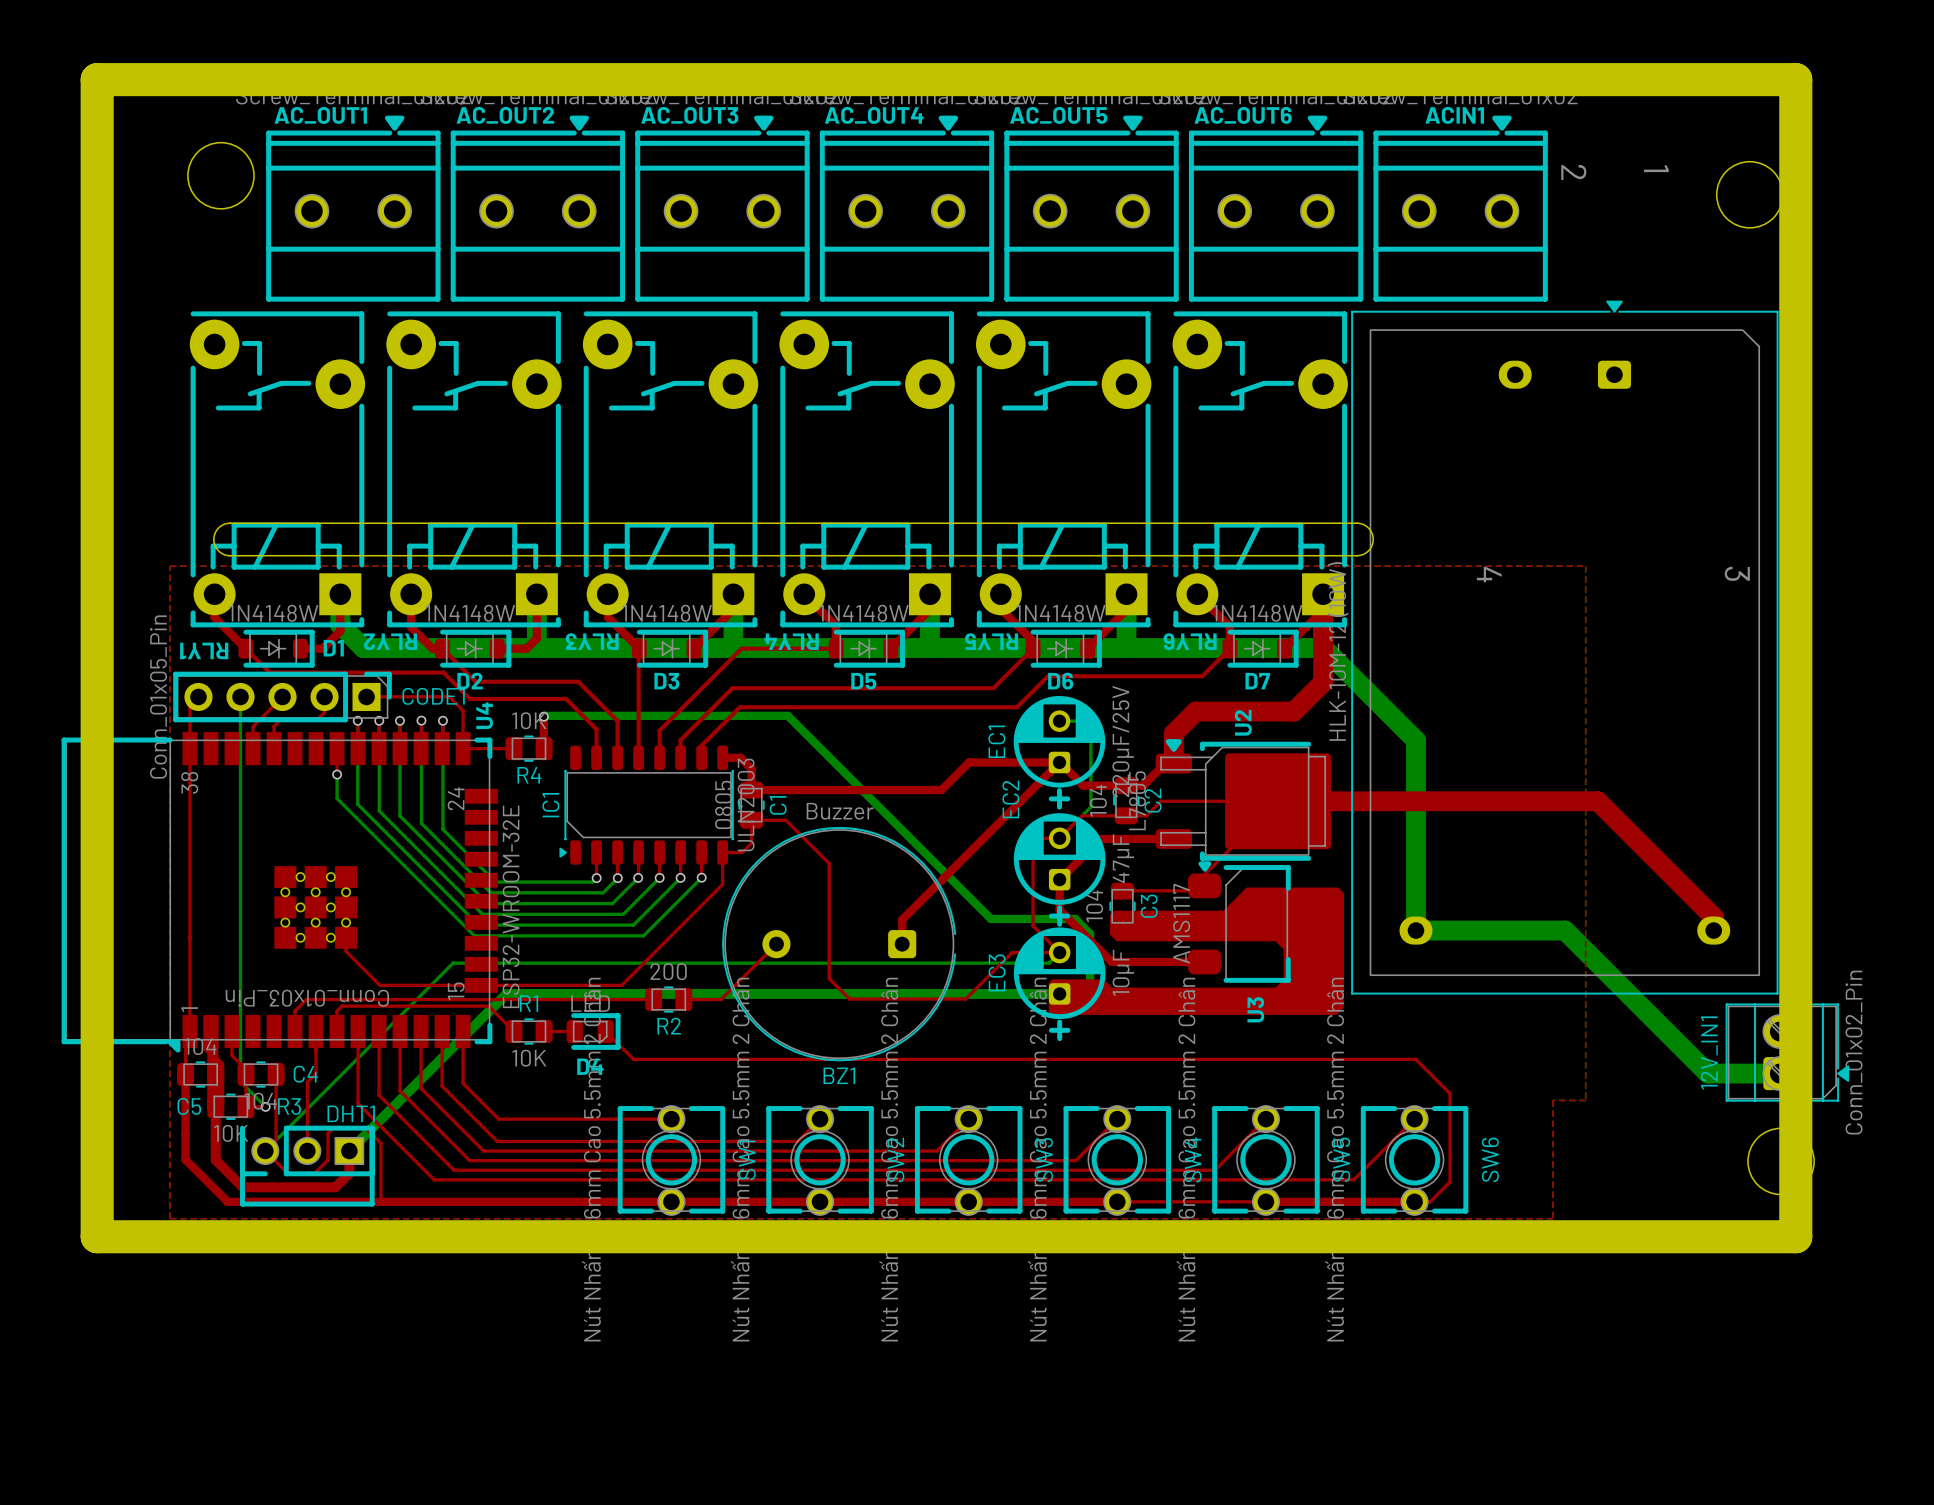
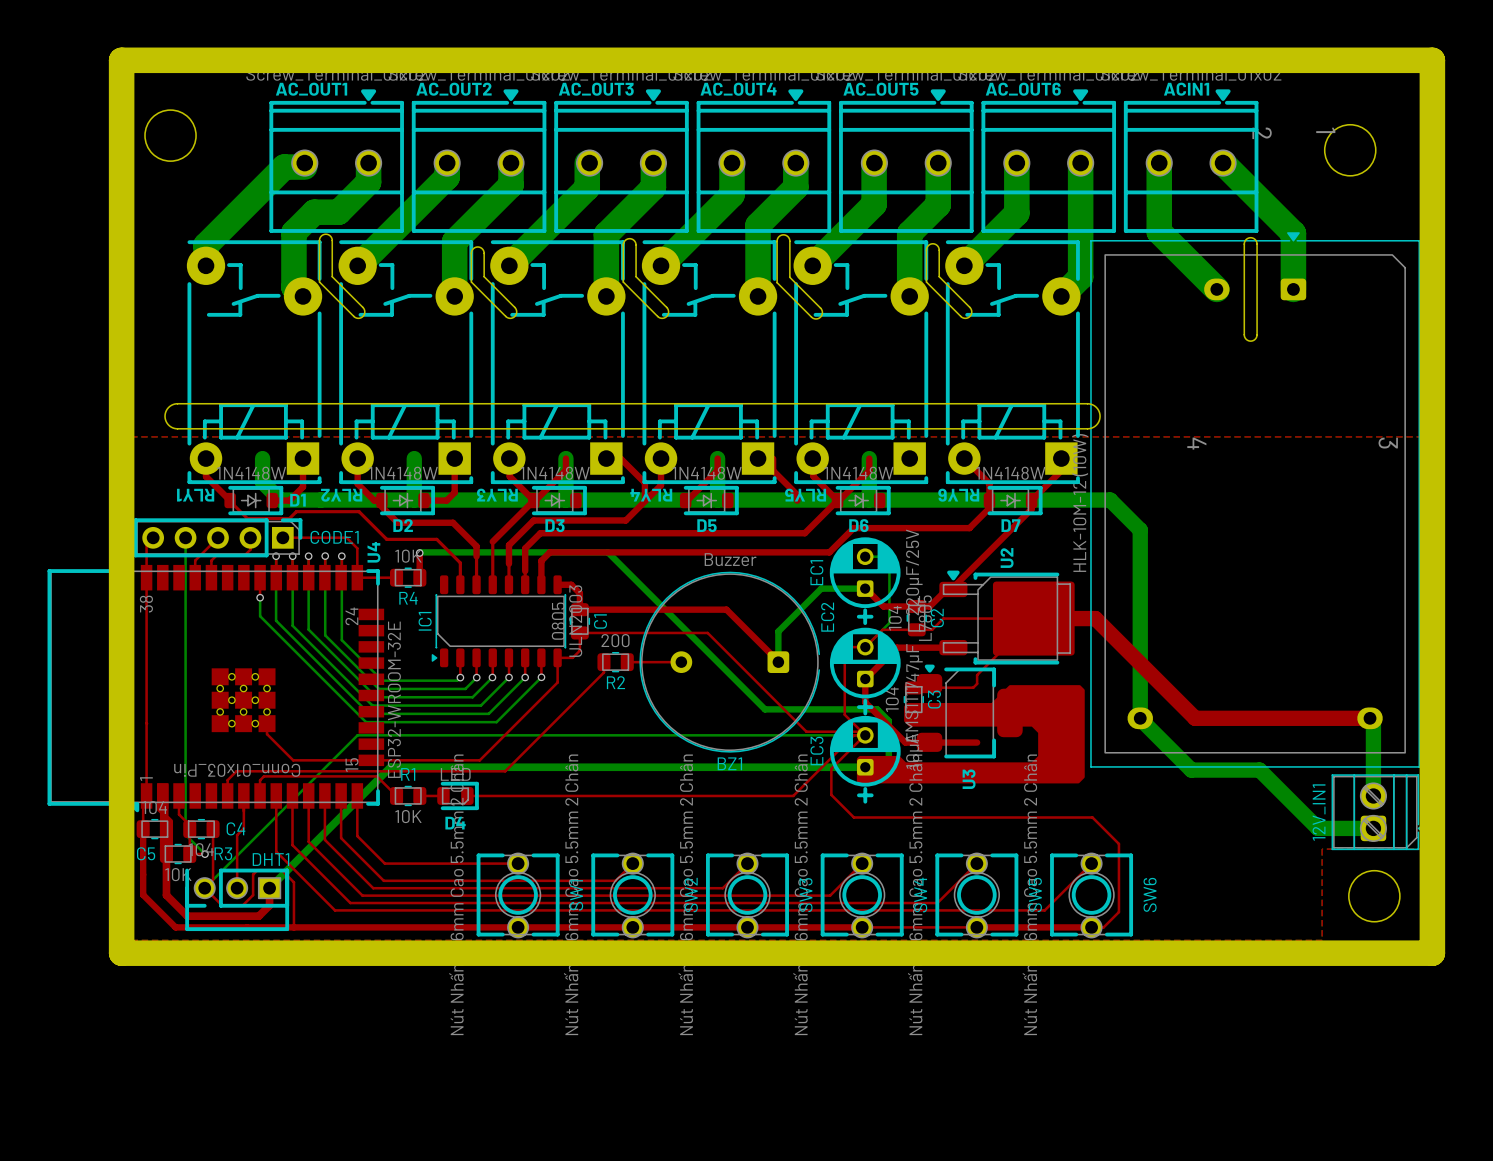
board edge: (97, 79) (1795, 79) (1795, 1236) (97, 1236) (97, 79) -> (121, 60) (1432, 60) (1432, 953) (121, 953) (121, 60)
AC_OUT1 position: (353, 208) -> (336, 161)
AC_OUT2 position: (537, 208) -> (479, 161)
AC_OUT3 position: (722, 208) -> (621, 161)
AC_OUT4 position: (906, 208) -> (763, 161)
AC_OUT5 position: (1091, 208) -> (906, 161)
AC_OUT6 position: (1276, 208) -> (1048, 161)
ACIN1 position: (1460, 208) -> (1191, 161)
bottom track: none -> (368, 163) (368, 182) (338, 212) (314, 212) (293, 232) (293, 287) (303, 296)
bottom track: none -> (447, 163) (447, 177) (358, 265)
bottom track: none -> (511, 163) (511, 185) (454, 241) (454, 296)
bottom track: none -> (587, 163) (587, 187) (509, 265)
bottom track: none -> (653, 163) (653, 187) (606, 234) (606, 296)
bottom track: none -> (732, 163) (732, 194) (661, 265)
bottom track: none -> (795, 163) (795, 187) (758, 225) (758, 296)
bottom track: none -> (874, 163) (874, 204) (812, 265)
bottom track: none -> (938, 163) (938, 204) (909, 233) (909, 296)
bottom track: none -> (1016, 163) (1016, 213) (964, 265)
bottom track: none -> (1080, 163) (1080, 277) (1061, 296)
bottom track: none -> (1159, 163) (1159, 231) (1216, 289)
bottom track: none -> (1223, 163) (1293, 233) (1293, 289)
bottom track: none -> (304, 167) (284, 167) (206, 245) (206, 265)
board edge: none -> (1244, 244) (1244, 335) (1246, 339) (1251, 341) (1255, 338) (1257, 334) (1257, 243) (1254, 239) (1250, 237) (1246, 239) (1244, 244)
board edge: none -> (623, 245) (628, 238) (632, 239) (635, 242) (636, 276)
board edge: none -> (623, 245) (623, 282) (658, 316) (666, 316) (668, 313) (667, 308) (636, 276)
board edge: none -> (484, 253) (484, 276)
board edge: none -> (484, 253) (479, 247) (475, 247) (471, 250) (471, 282) (506, 317) (514, 317) (516, 312) (515, 308) (484, 276)
board edge: none -> (332, 276) (332, 239) (329, 235) (325, 234) (319, 239) (319, 282) (354, 316) (362, 316) (364, 312) (363, 308) (332, 276)
board edge: none -> (939, 276) (939, 248) (936, 244) (931, 244) (926, 249) (926, 282) (961, 316) (969, 316) (971, 312) (970, 308) (939, 276)
board edge: none -> (789, 277) (789, 240) (787, 236) (782, 234) (777, 240) (777, 282) (812, 317) (819, 317) (822, 313) (821, 308) (789, 277)
RLY1 position: (277, 469) -> (254, 362)
RLY2 position: (474, 469) -> (406, 362)
RLY3 position: (670, 469) -> (557, 362)
RLY4 position: (867, 469) -> (709, 362)
RLY5 position: (1063, 469) -> (861, 362)
RLY6 position: (1260, 469) -> (1012, 362)
board edge: (1356, 523) (1368, 527) (1373, 539) (1368, 550) (1356, 555) -> (1047, 403) (1090, 404) (1097, 408) (1100, 416) (1097, 423) (1090, 428) (1047, 428)
top zone outline: (1585, 566) (1585, 1100) (1552, 1100) (1552, 1218) -> (1223, 436) (1424, 436) (1424, 849) (1322, 849) (1322, 940) (1198, 940)
top track: (214, 594) (214, 617) (245, 648) -> none
top track: (340, 594) (340, 631) (322, 648) (300, 648) -> (303, 458) (303, 486) (289, 500) (272, 500)
top track: (411, 594) (411, 627) (432, 648) (442, 648) (475, 681) (578, 681) (617, 721) -> (381, 506) (397, 522) (453, 522) (476, 546) (476, 556)
top track: none -> (357, 458) (357, 483) (374, 500) (381, 500)
top track: (536, 594) (536, 638) (526, 648) (497, 648) -> (454, 458) (454, 492) (446, 500) (424, 500)
top track: (608, 594) (608, 617) (639, 648) -> (509, 458) (509, 476) (533, 500)
top track: none -> (813, 458) (813, 476) (837, 500)
top track: (1197, 594) (1229, 626) (1229, 648) (1202, 676) (1047, 676) (1016, 707) (739, 707) (701, 745) -> (964, 458) (989, 483) (989, 508) (969, 528) (853, 528) (829, 552) (549, 552) (541, 560) (541, 575)
bottom track: (1323, 594) (1323, 647) (1415, 740) (1415, 930) (1565, 930) (1632, 997) -> (1021, 500) (1110, 500) (1140, 530) (1140, 718) (1191, 770) (1259, 770)
top track: none -> (1061, 458) (1061, 470) (1031, 500) (1031, 509) (953, 587) (953, 590) (946, 590) (929, 606) (883, 606) (865, 588)
part position: (1564, 647) -> (1255, 499)
top track: (245, 648) (269, 672) (443, 672) (469, 698) (501, 698) -> (206, 458) (206, 476) (247, 518) (289, 518) (296, 511) (359, 511) (386, 539)
D1 position: (276, 648) -> (253, 500)
D2 position: (473, 648) -> (405, 500)
top track: (639, 648) (638, 701) -> (533, 500) (492, 541)
D3 position: (670, 648) -> (557, 500)
top track: (836, 648) (741, 648) (659, 730) -> (661, 458) (661, 485) (625, 520) (533, 520) (508, 545) (508, 563)
D5 position: (866, 648) -> (709, 500)
top track: (1033, 648) (993, 688) (732, 688) (680, 740) -> (837, 500) (804, 533) (540, 533) (525, 548) (525, 571)
D6 position: (1063, 648) -> (861, 500)
D7 position: (1260, 648) -> (1013, 500)
top track: (1284, 648) (1323, 610) (1323, 594) (1323, 682) (1294, 711) (1195, 711) (1173, 733) (1173, 763) -> none
RLY1 name position: RLY1 (204, 650) -> RLY1 (195, 495)
bottom track: (1059, 721) (1076, 721) (1090, 735) (1090, 807) (1059, 838) -> (865, 556) (878, 556) (889, 567) (889, 623) (865, 647)
EC1 position: (1059, 752) -> (865, 581)
top track: (1173, 761) (1173, 764) (1164, 764) (1143, 785) (1083, 785) (1060, 762) (969, 762) (941, 790) -> (778, 662) (726, 609)
top track: (1059, 762) (902, 919) (902, 944) -> none
bottom track: none -> (865, 588) (821, 588) (778, 631) (778, 662)
U2 position: (1243, 799) -> (1006, 617)
C2 position: (1126, 800) -> (916, 618)
top track: (1278, 801) (1597, 801) (1713, 917) (1713, 930) -> none
top track: none -> (1033, 618) (1095, 618) (1195, 718) (1370, 718)
top track: (785, 820) (829, 863) (829, 978) (849, 999) (965, 999) (1012, 952) (1059, 952) (1033, 925) (1033, 846) (1040, 838) (1059, 838) (1082, 815) (1146, 815) (1160, 801) (1277, 801) (1204, 874) (1204, 885) (1199, 890) (1122, 891) -> (606, 632) (707, 632) (806, 731) (861, 731)
top track: (1173, 838) (1100, 838) (1059, 879) -> (953, 647) (896, 647) (865, 679)
top track: none -> (603, 662) (603, 672) (504, 771)
top track: none -> (627, 662) (681, 662)
EC2 position: (1059, 869) -> (865, 671)
top track: (1059, 879) (1059, 910) (1111, 961) (1204, 961) -> (865, 679) (865, 702) (905, 742) (977, 742)
C3 position: (1122, 906) -> (913, 699)
bottom track: (991, 918) (1075, 918) (1090, 933) (1090, 985) (1082, 993) (506, 994) -> (764, 709) (877, 709) (888, 720) (888, 761) (882, 767) (390, 767)
bottom track: none -> (1373, 721) (1373, 795)
top track: (776, 944) (721, 999) (683, 999) -> none
BZ1 position: (839, 944) -> (729, 662)
drawing position: (1196, 951) -> (970, 734)
bottom track: (1059, 952) (1049, 963) (453, 963) -> (865, 735) (357, 735) (349, 743)
top track: none -> (864, 735) (831, 768) (831, 794) (853, 817)
EC3 position: (1059, 984) -> (865, 759)
R2 position: (668, 999) -> (615, 662)
top track: (605, 1031) (633, 1059) (1106, 1059) -> (467, 795) (793, 795) (853, 735) (865, 735) (844, 714) (844, 653) (850, 647) (865, 647) (882, 629) (932, 629) (943, 618) (1033, 618) (977, 675) (977, 683) (973, 687) (913, 687)

